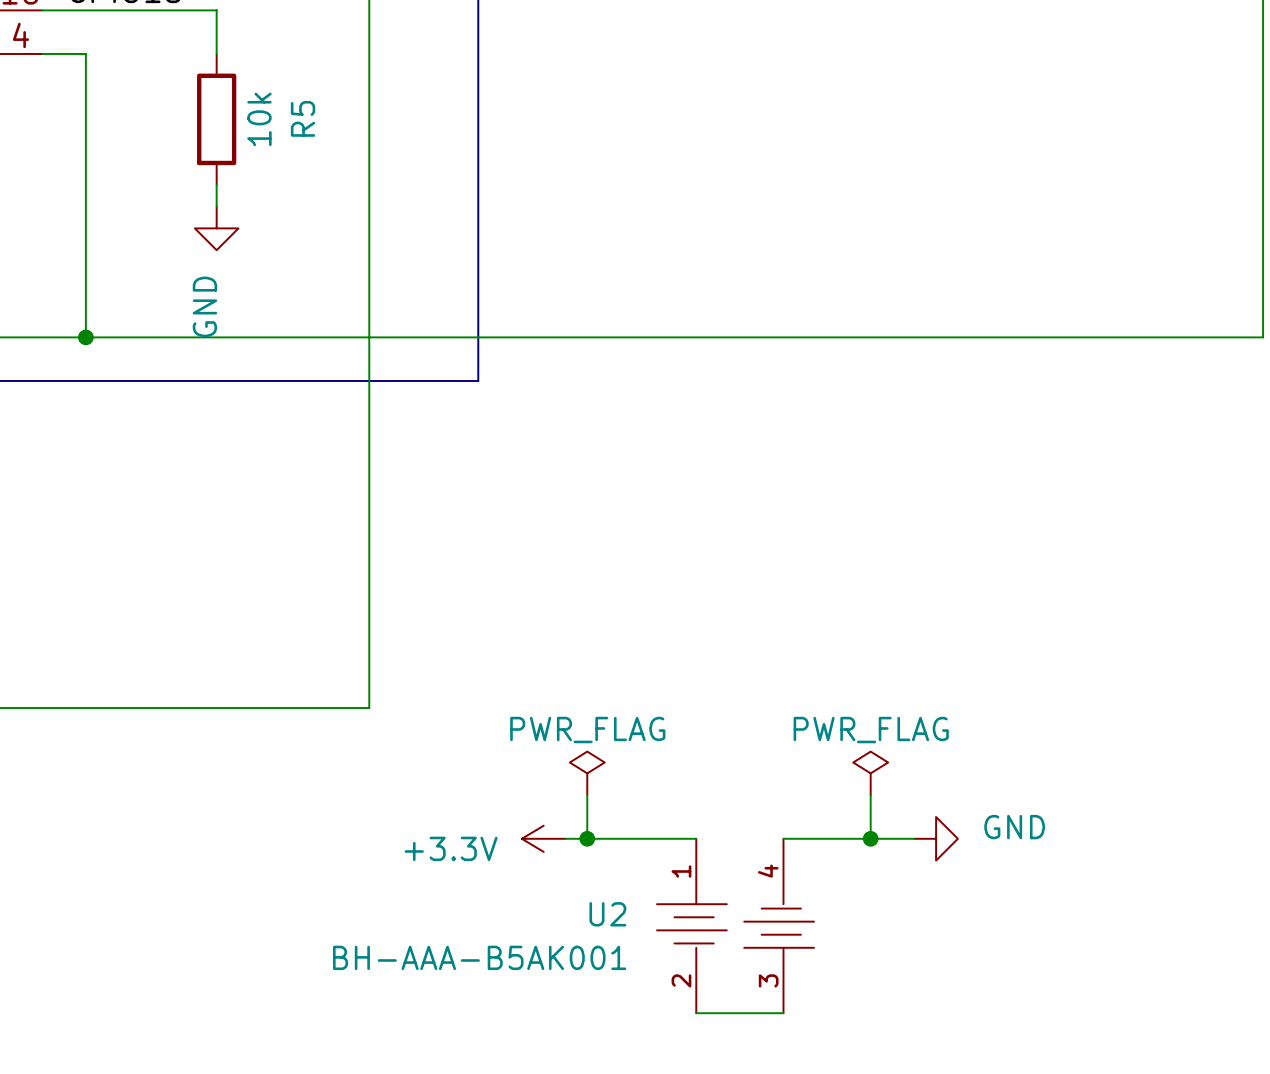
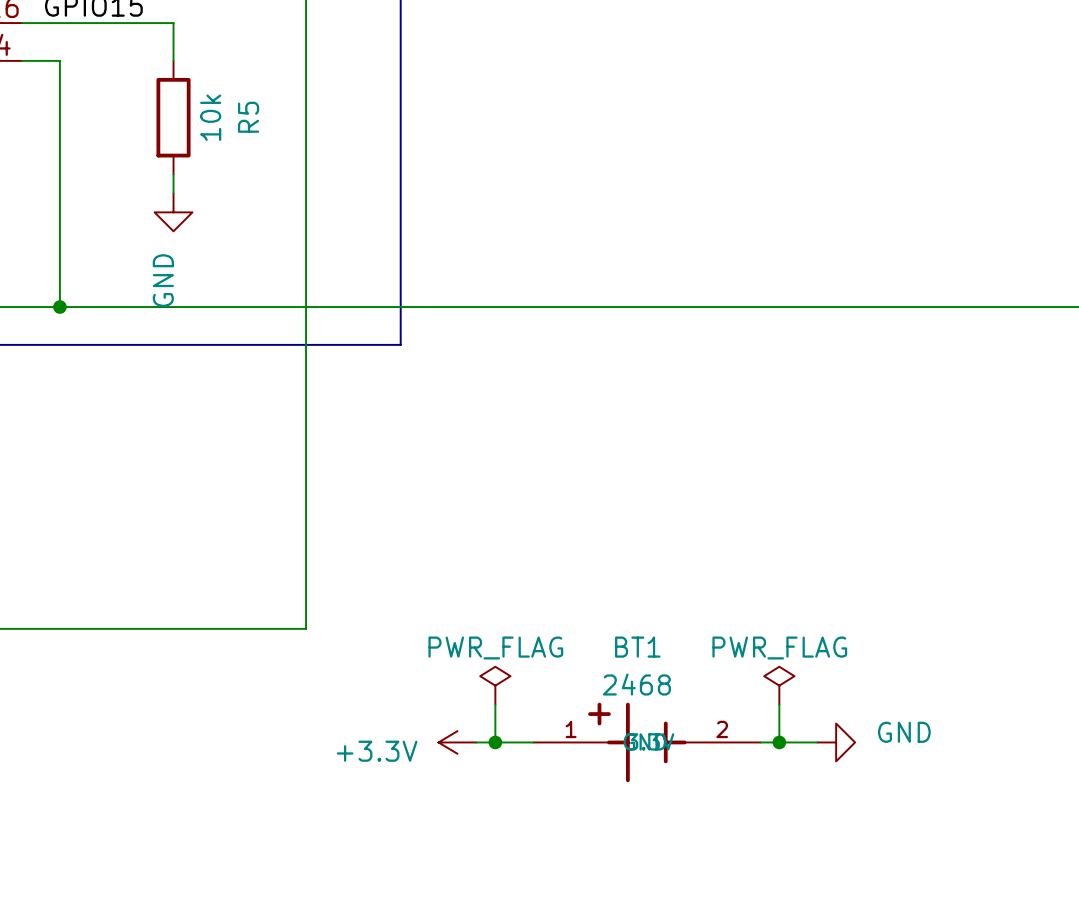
power symbol position: PWR_FLAG (870, 773) -> PWR_FLAG (779, 685)
wire: (870, 795) (870, 838) -> none
wire: none -> (779, 704) (779, 742) (817, 742)
BT1: none -> 2468 (646, 742)
junction position: (870, 838) -> (779, 742)
power symbol position: GND (936, 838) -> GND (836, 742)
U2: BH-AAA-B5AK001 (735, 926) -> none
wire: (696, 1013) (783, 1013) -> none

